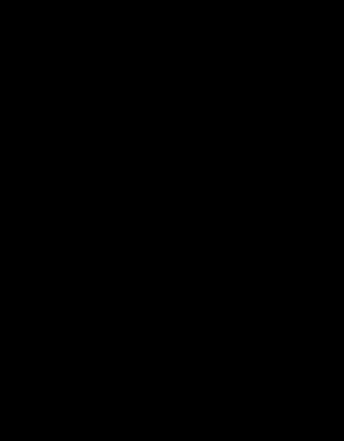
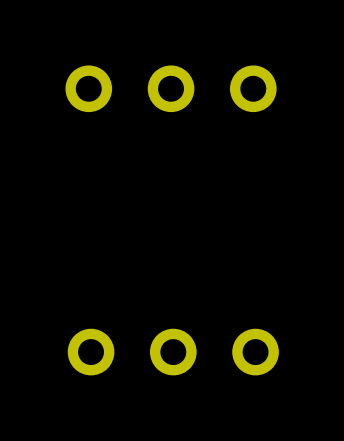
part: none -> (171, 88)
part: none -> (173, 352)

